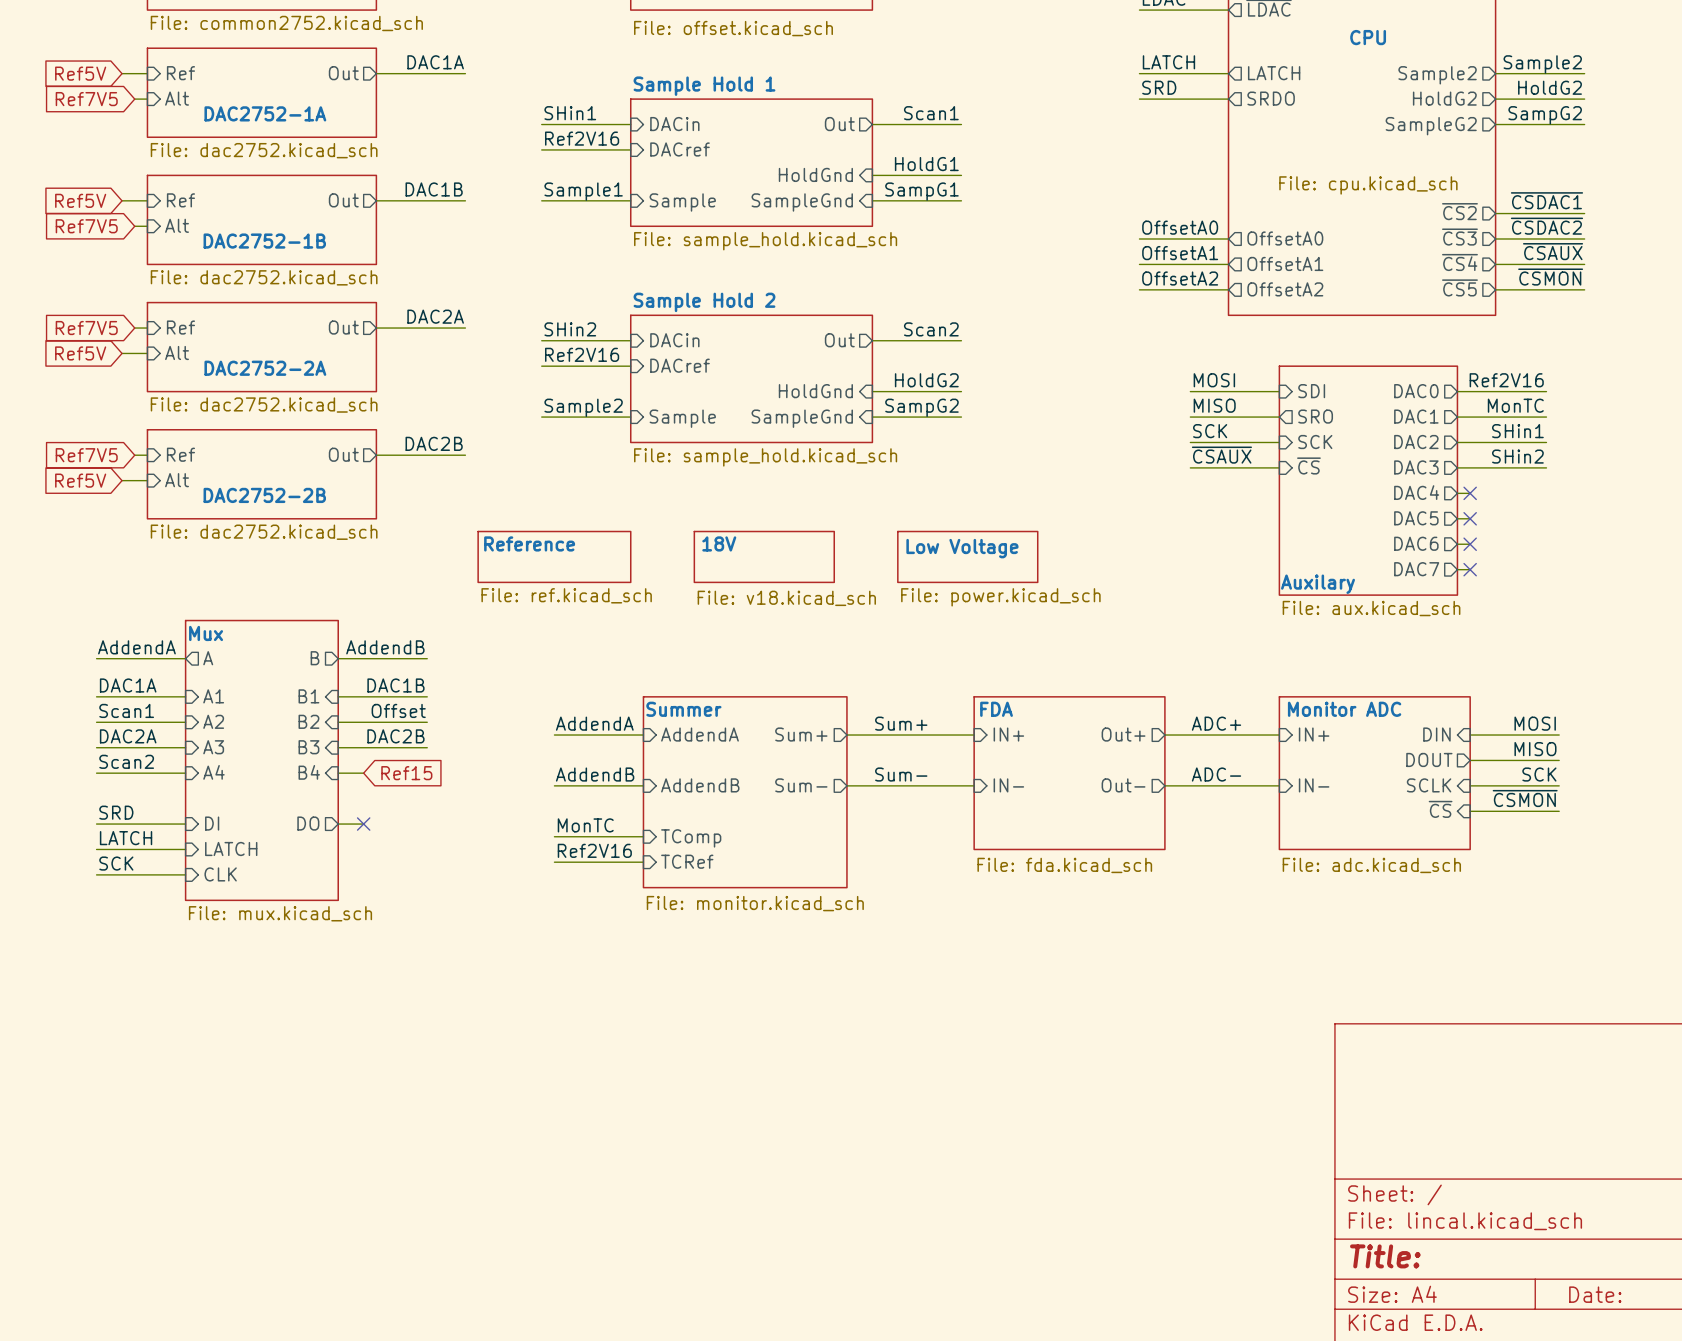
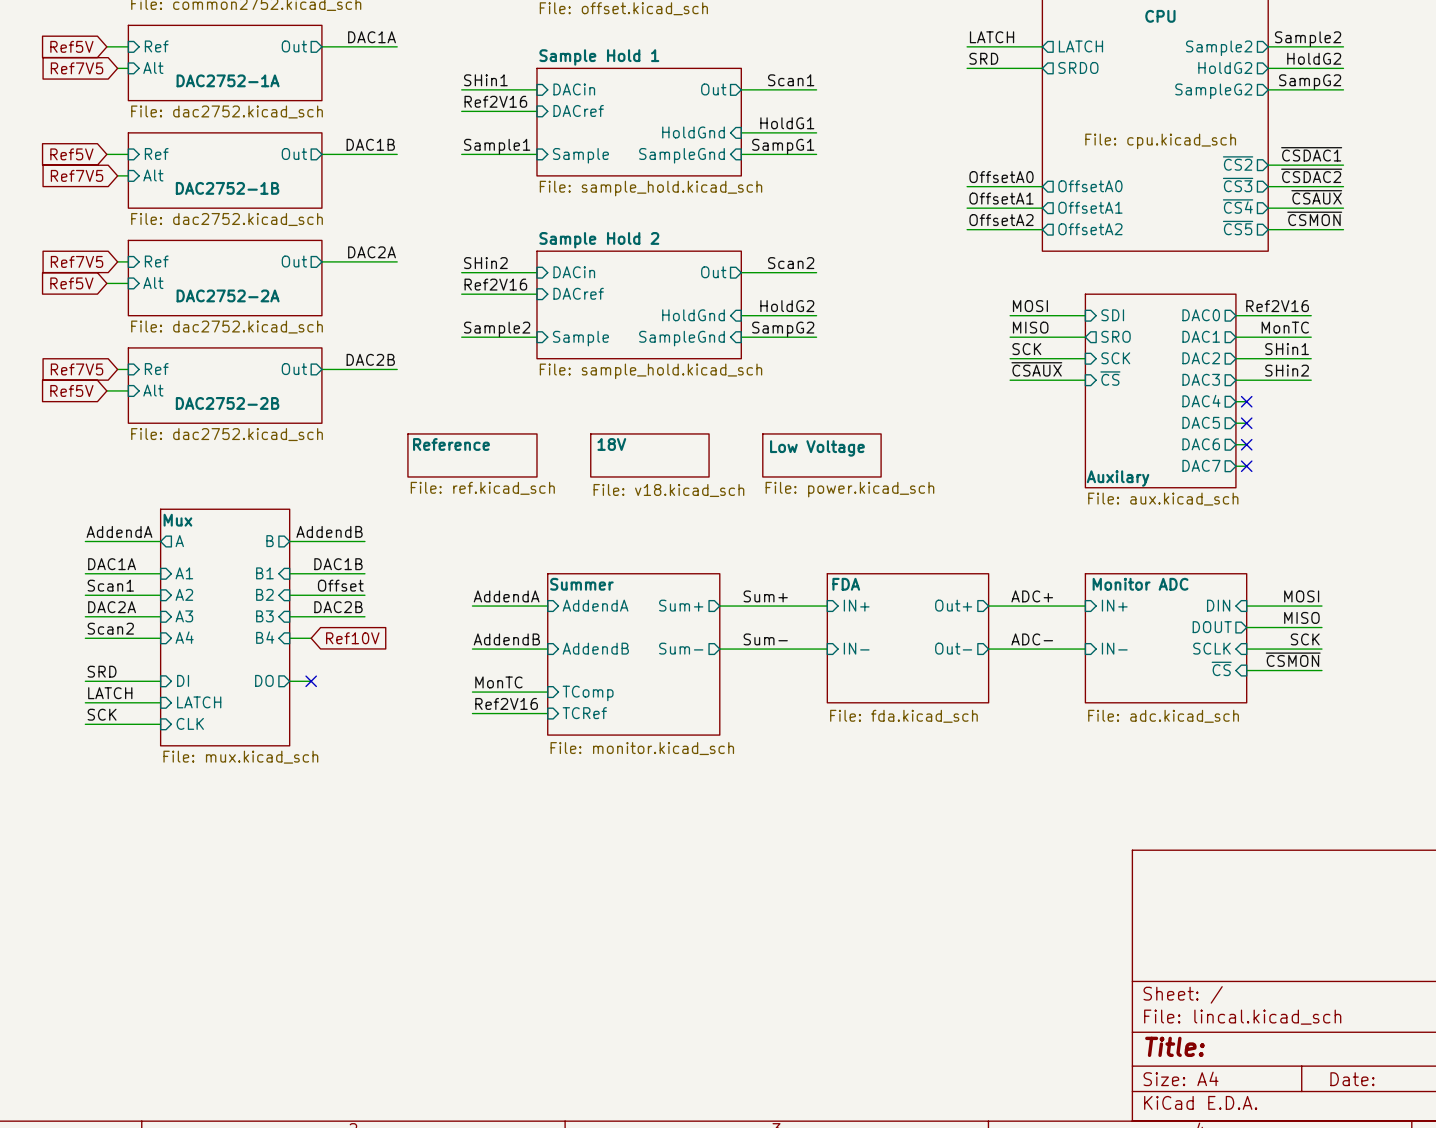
global label: Ref15 (406, 773) -> Ref10V (352, 638)

